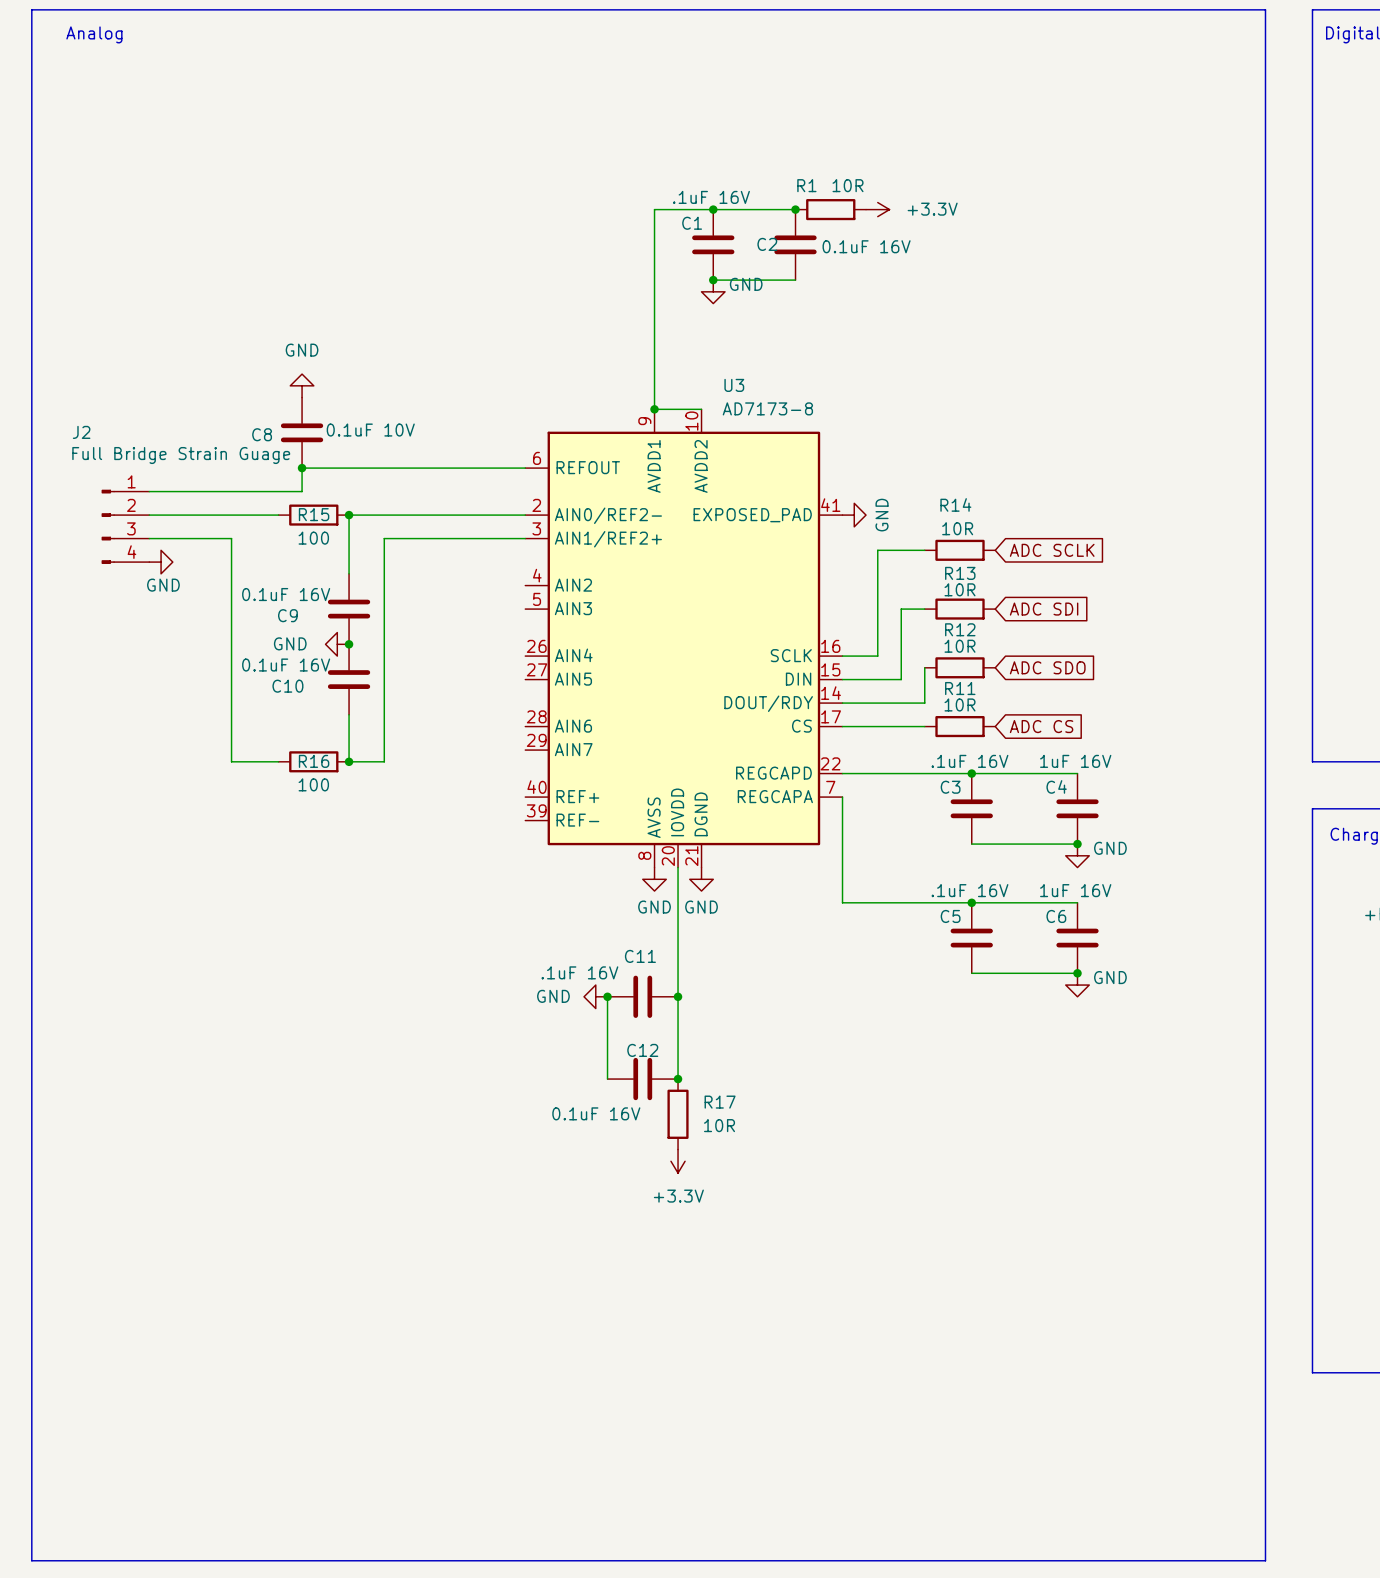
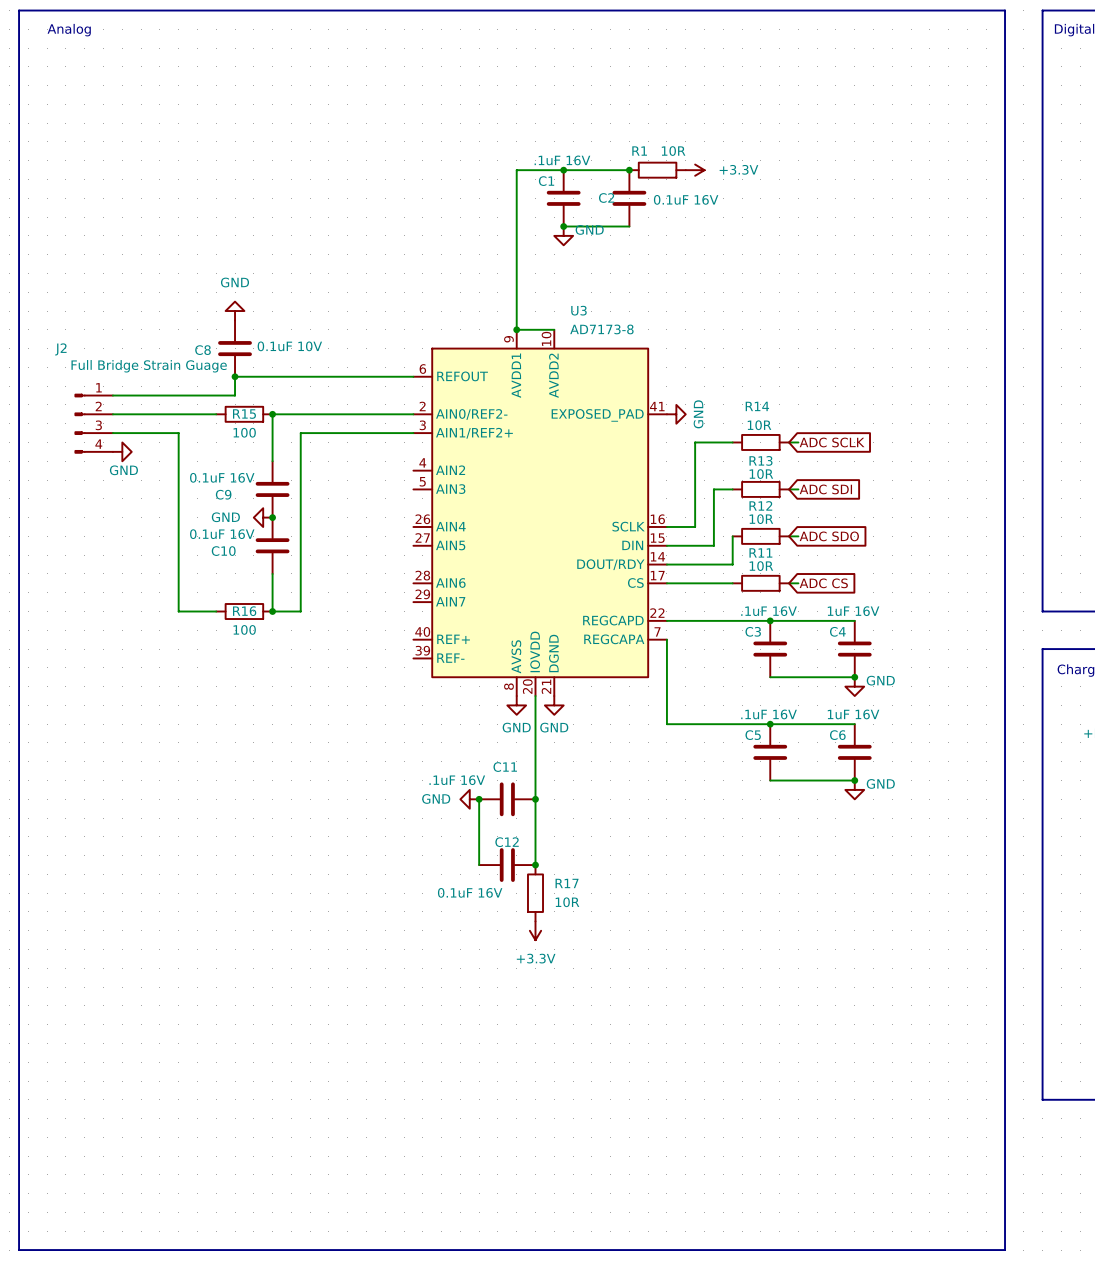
wire: none -> (789, 442) (798, 442)
wire: none -> (789, 489) (798, 489)
wire: none -> (789, 536) (798, 536)
wire: none -> (789, 583) (798, 583)

